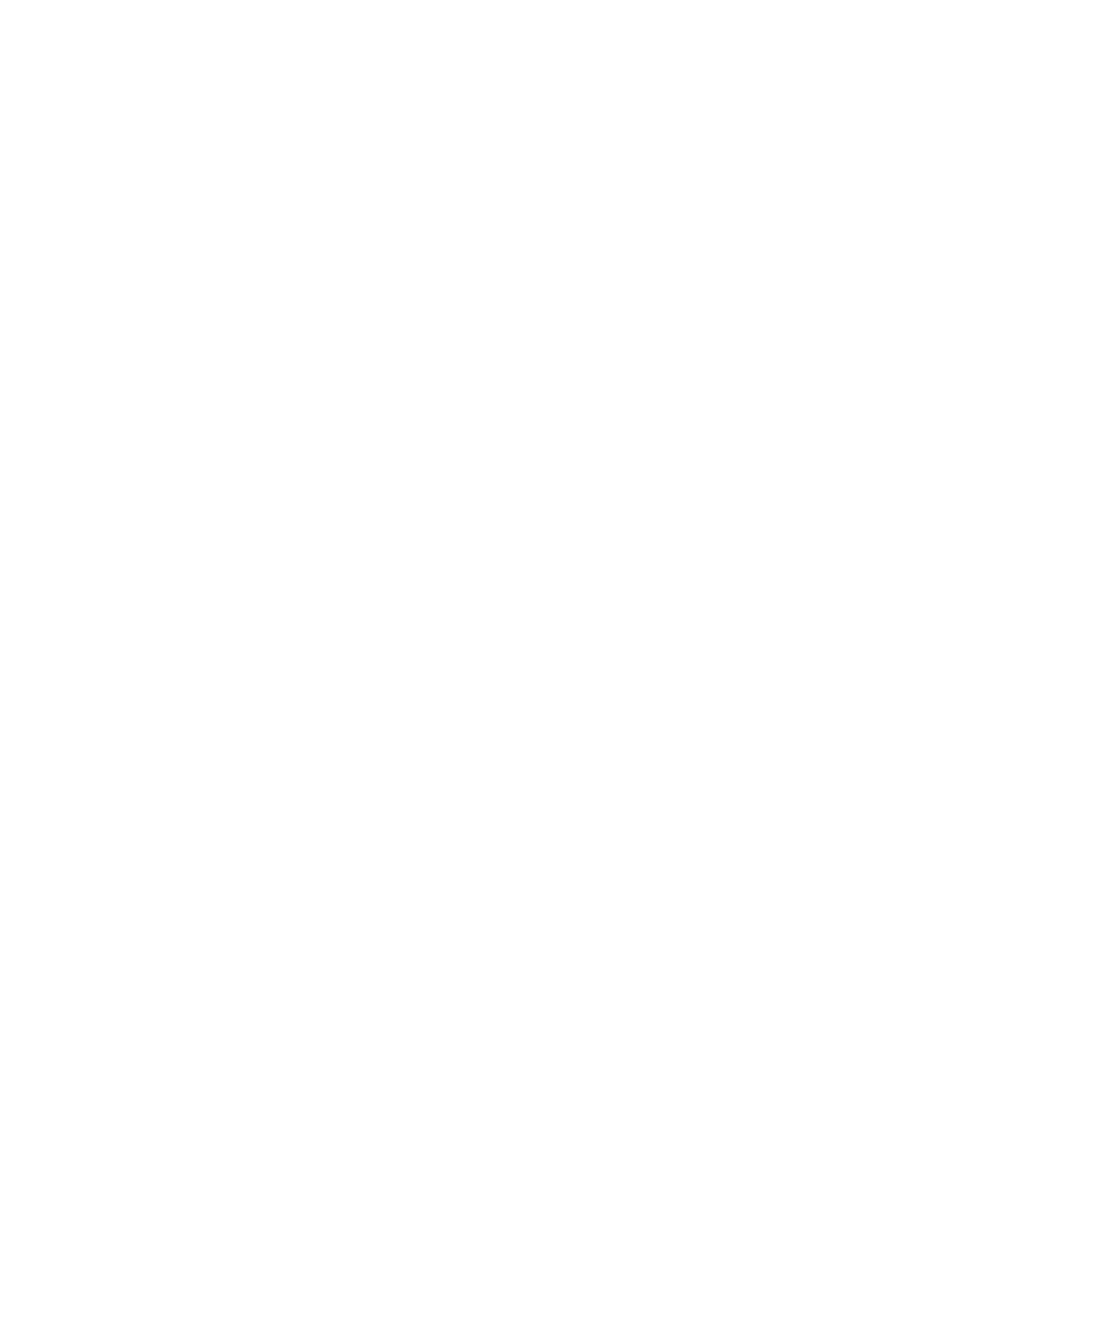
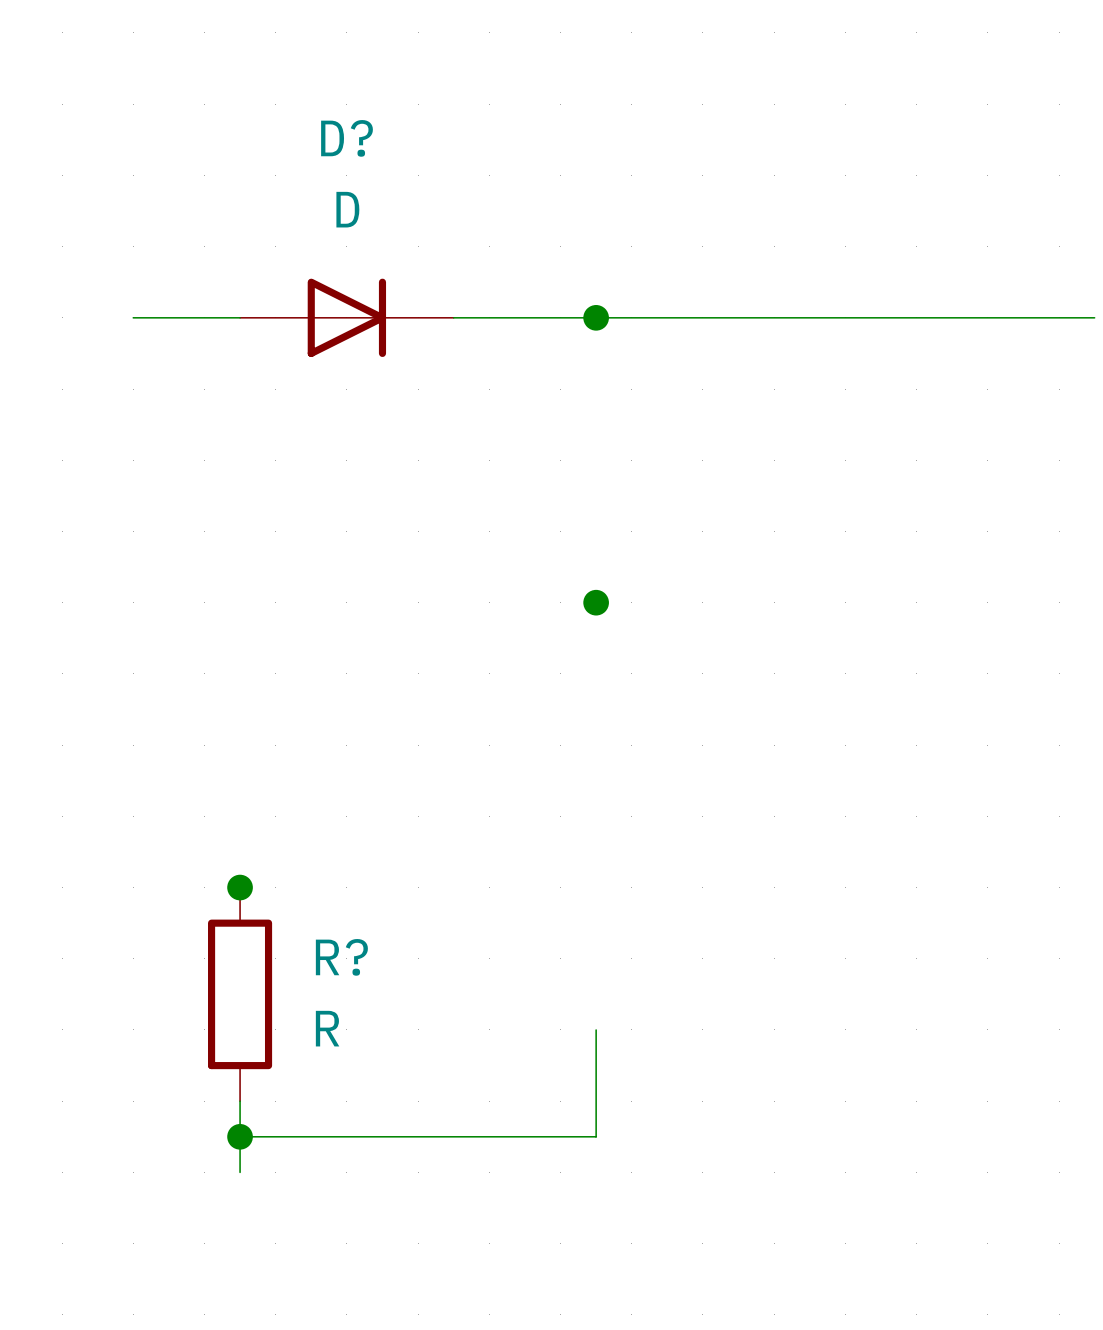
wire: none -> (133, 317) (240, 317)
D?: none -> D (346, 317)
wire: none -> (453, 317) (1094, 317)
junction: none -> (596, 317)
junction: none -> (596, 602)
junction: none -> (240, 887)
R?: none -> R (240, 994)
wire: none -> (596, 1029) (596, 1136) (240, 1136)
wire: none -> (240, 1101) (240, 1172)
junction: none -> (240, 1136)

